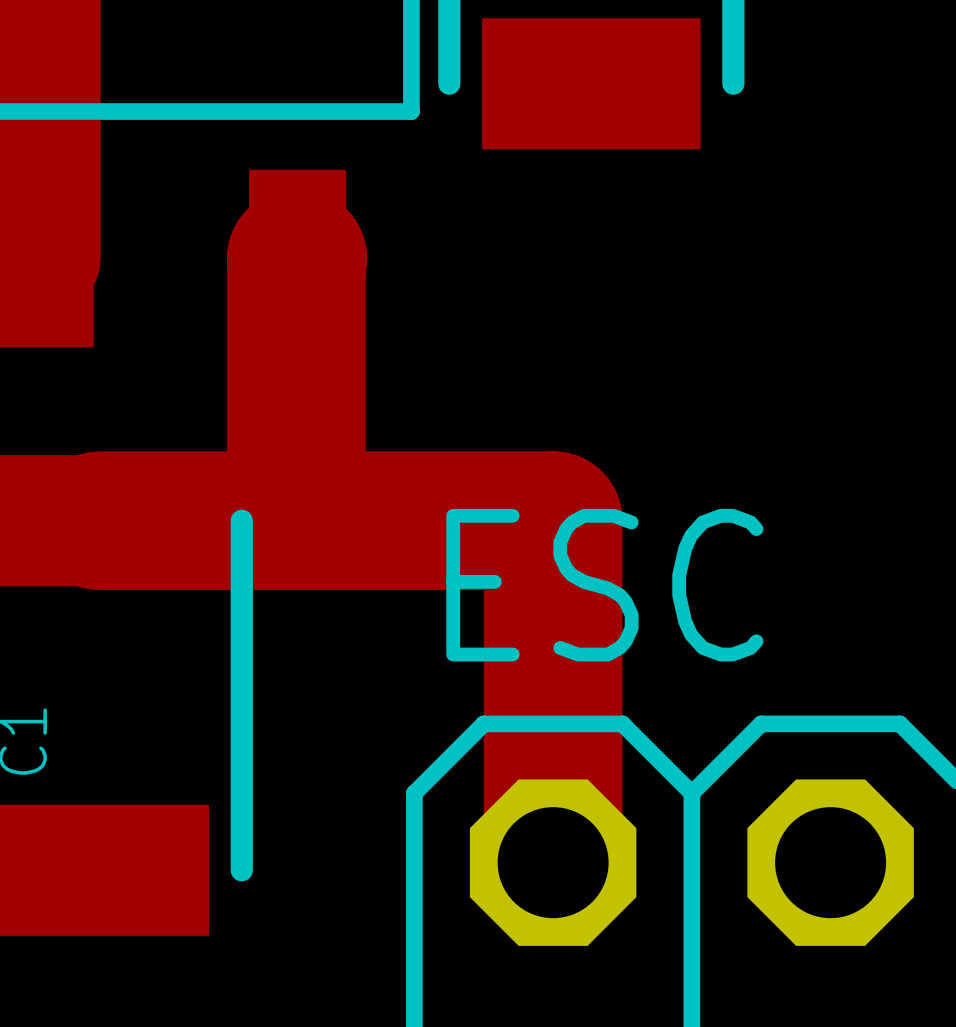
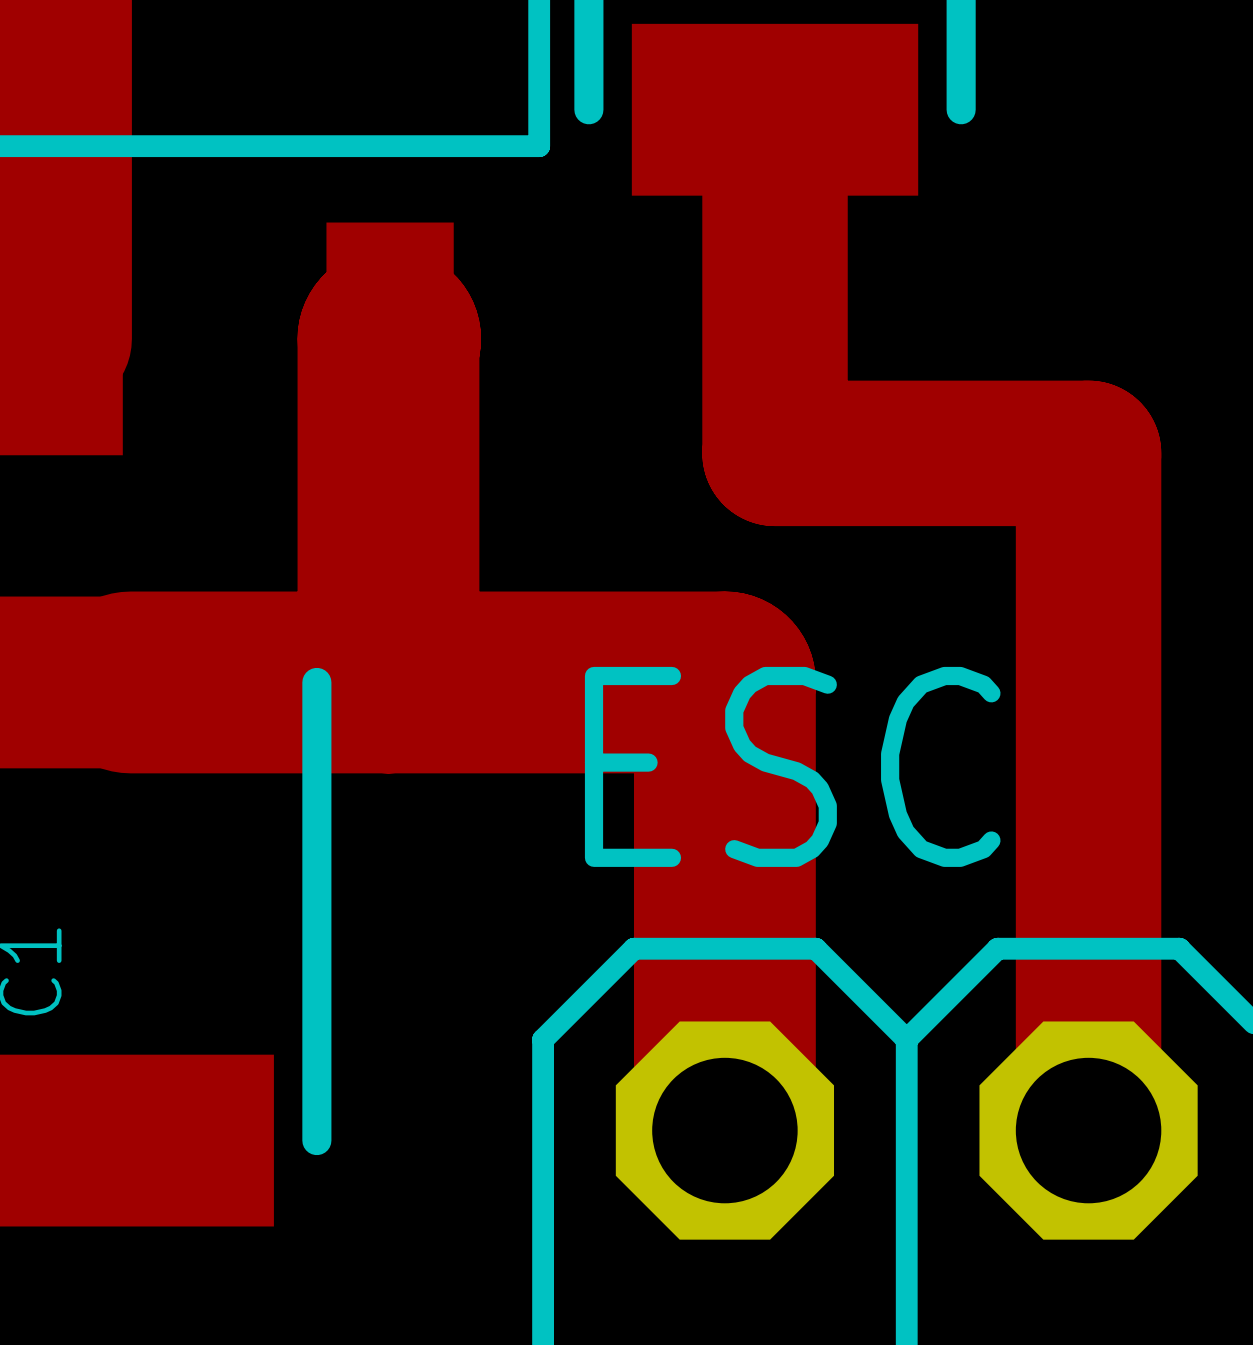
track: none -> (775, 109) (775, 453) (1088, 453) (1088, 1130)

